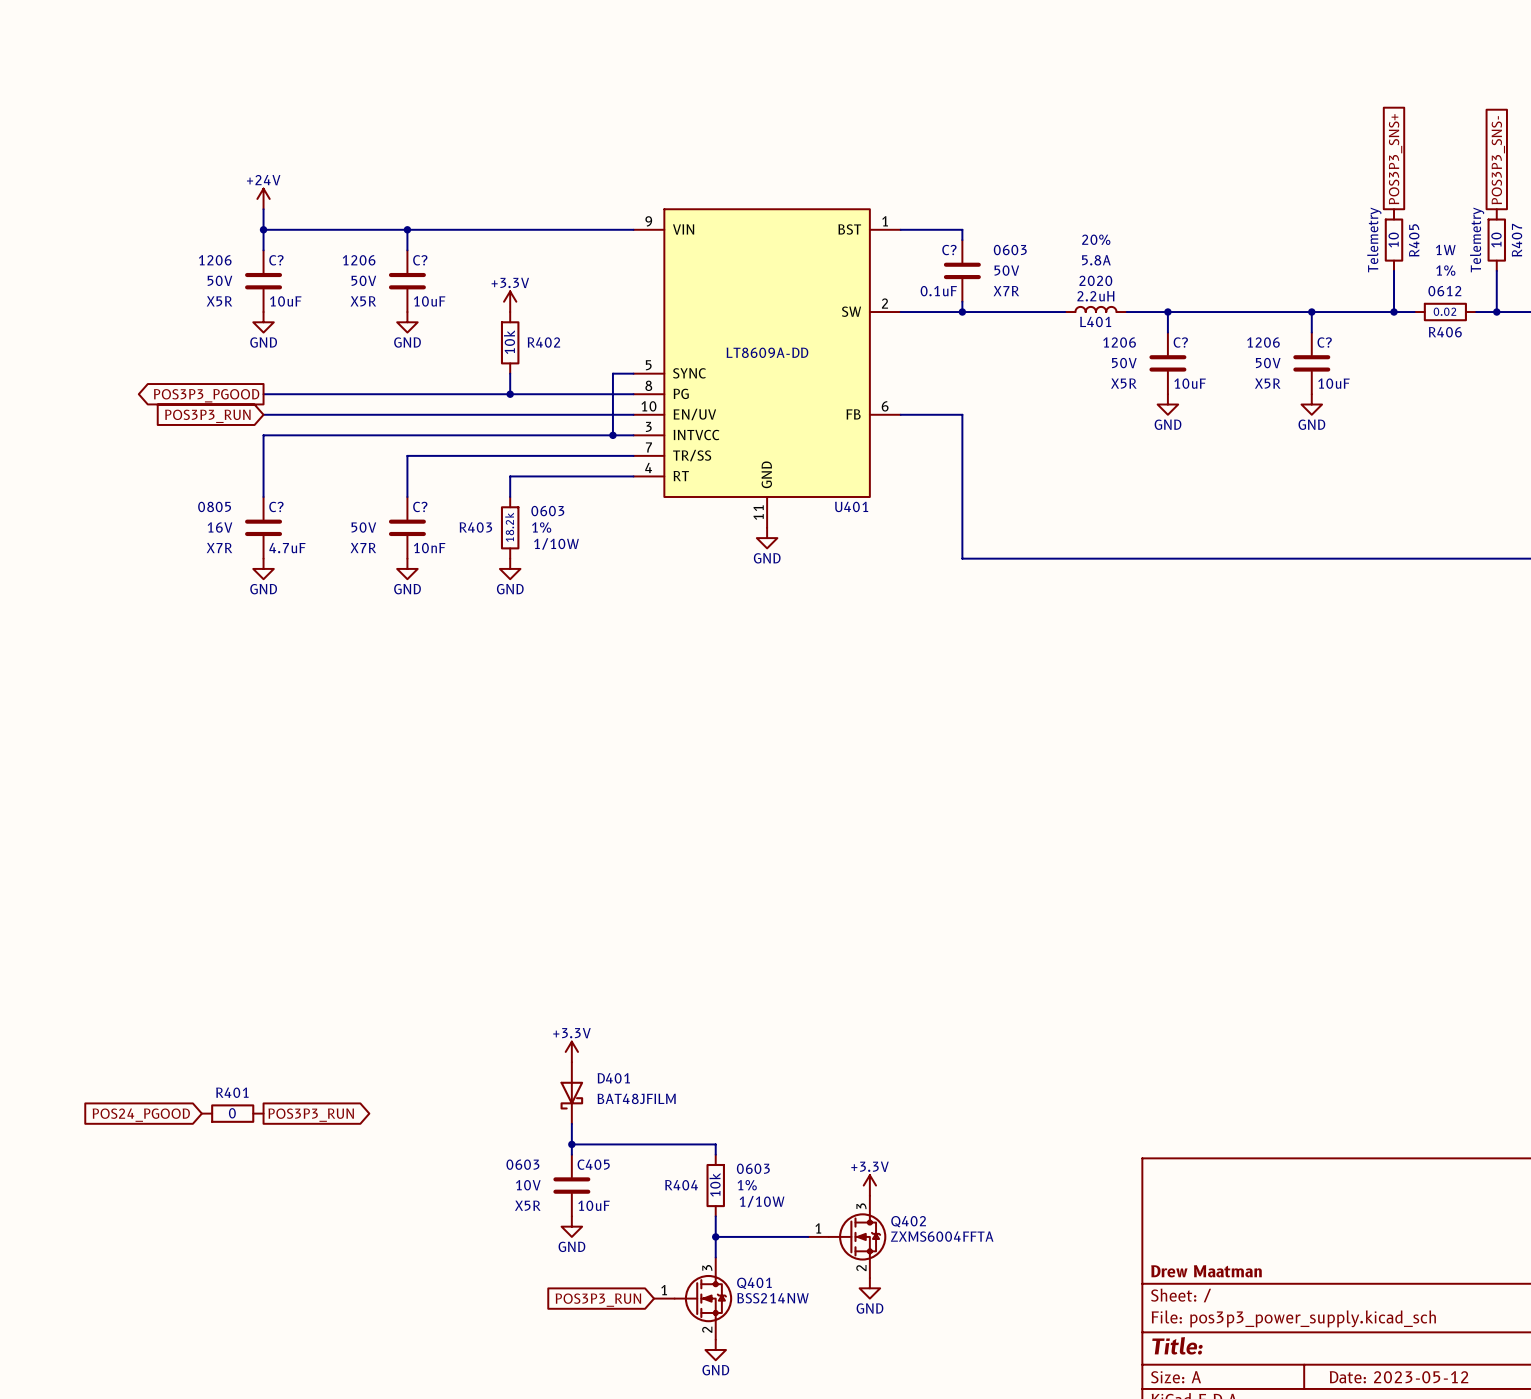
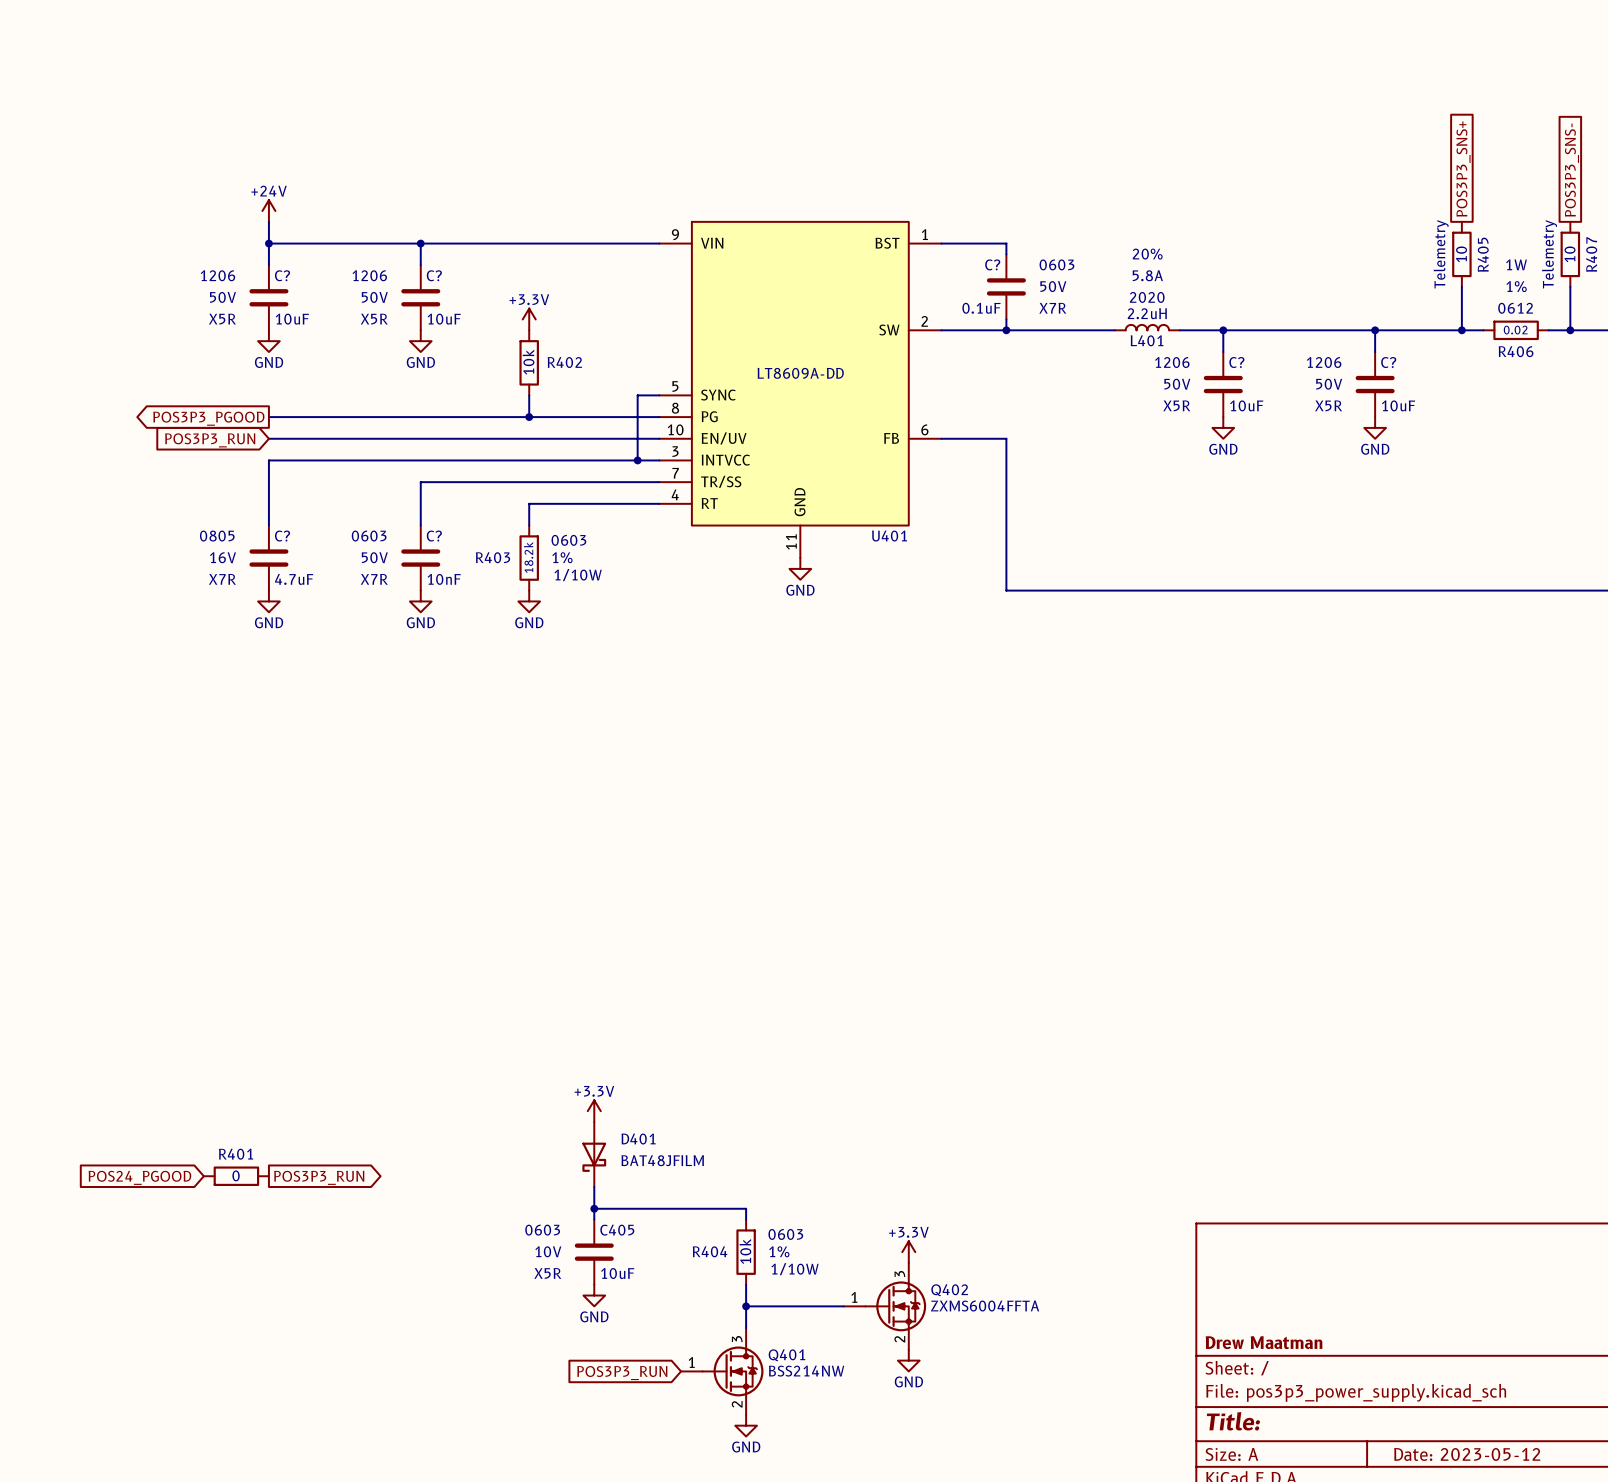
C? text: none -> 0603 (369, 536)

